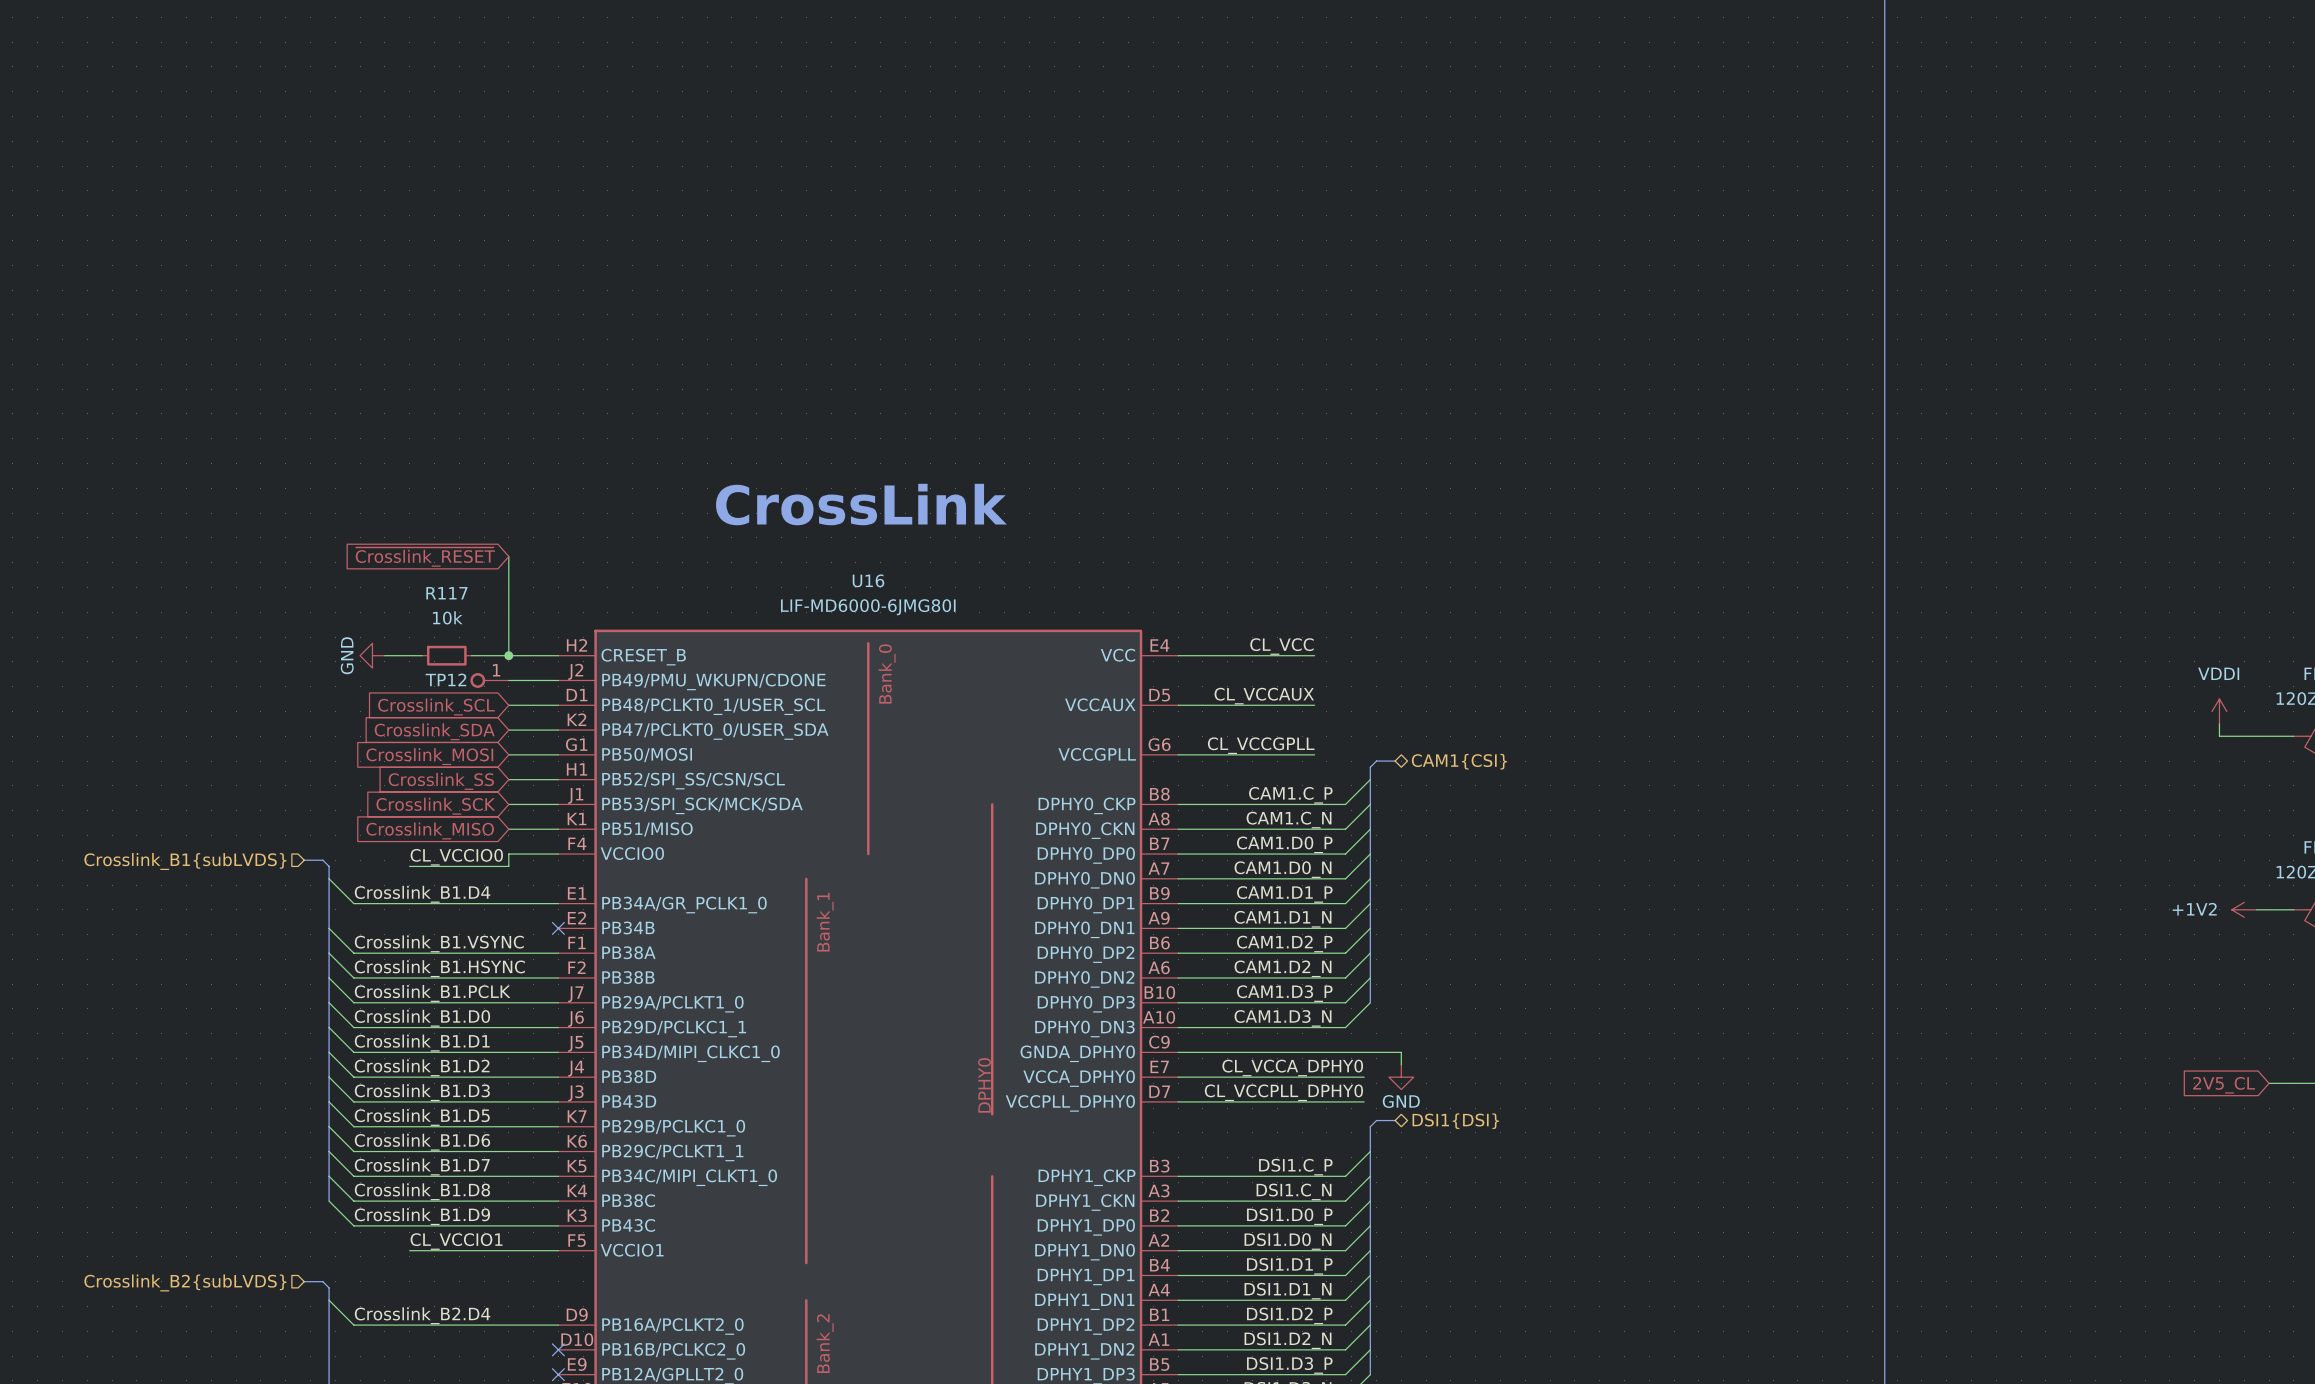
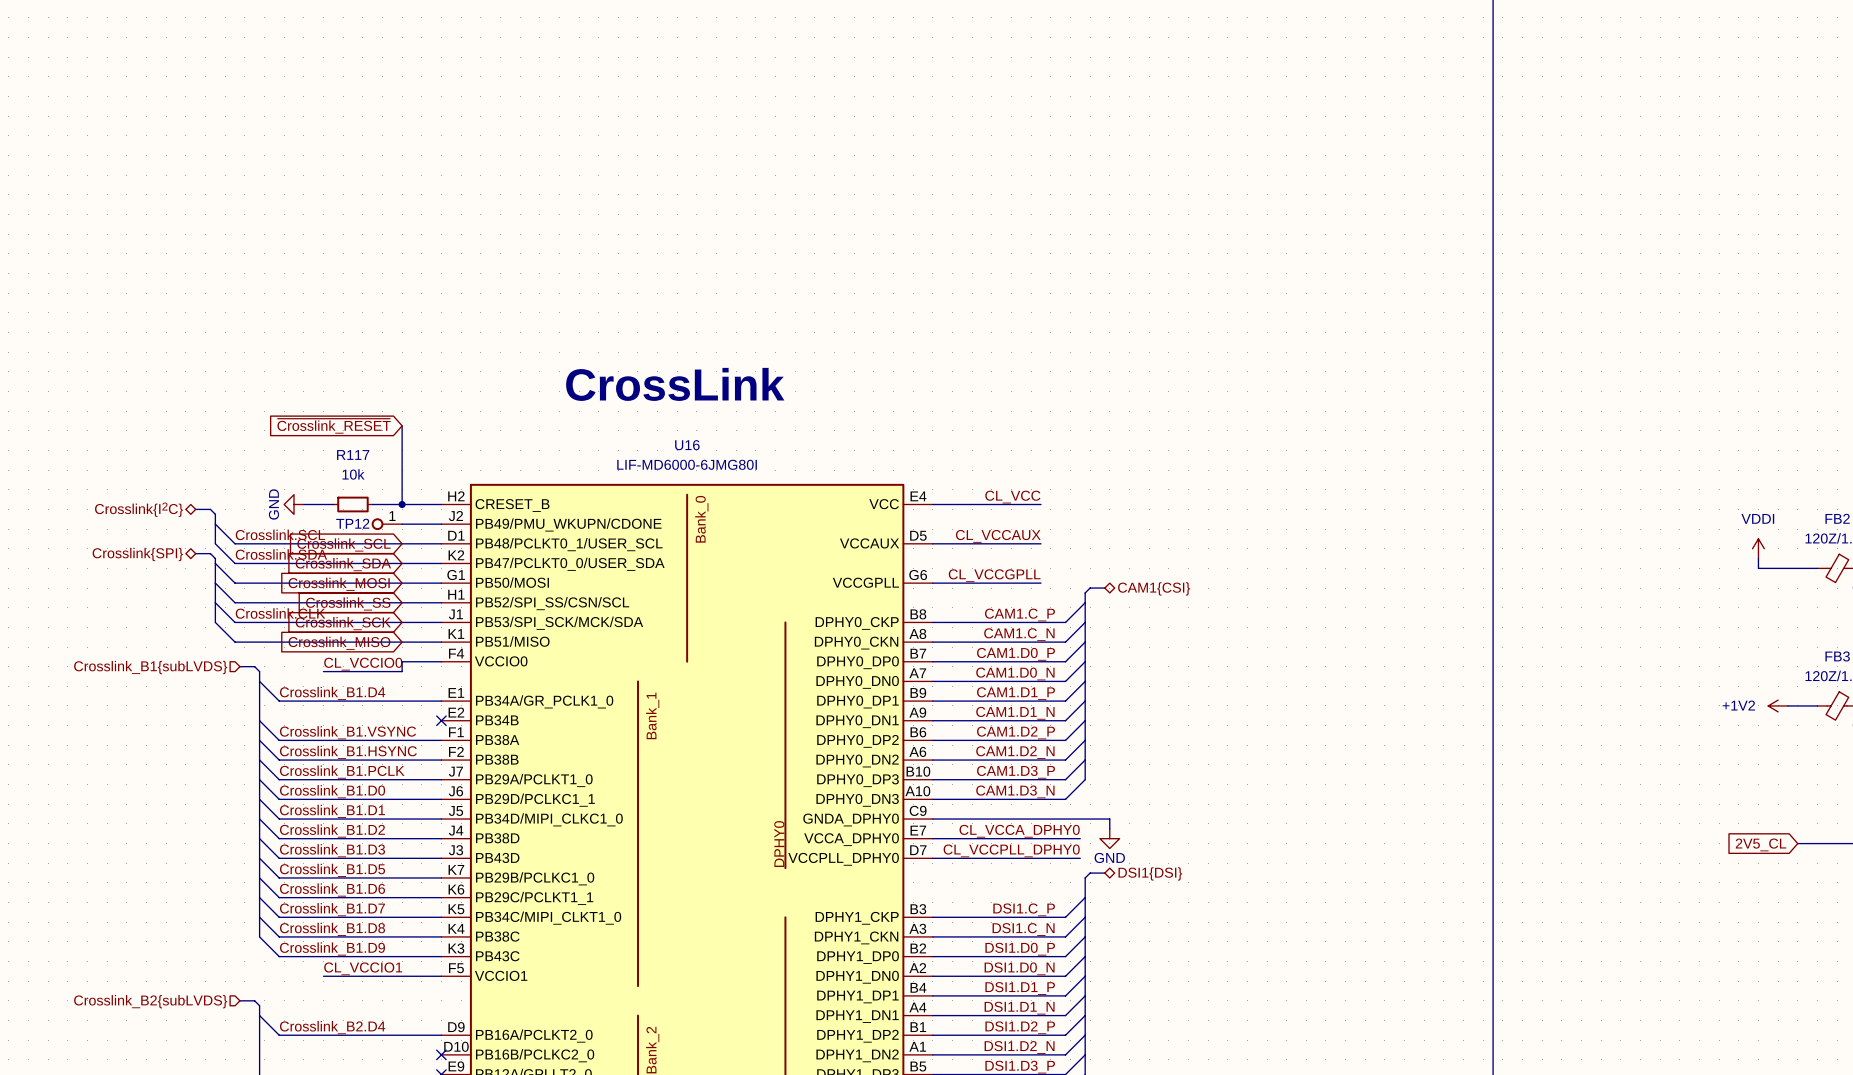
hierarchical label: none -> Crosslink{I2C} (139, 509)
bus: none -> (195, 509) (210, 509) (215, 514) (215, 543)
wire: none -> (215, 524) (235, 543) (402, 543)
label: none -> Crosslink.SCL (280, 534)
wire: none -> (215, 543) (235, 563) (402, 563)
bus: none -> (195, 553) (210, 553) (215, 558) (215, 622)
hierarchical label: none -> Crosslink{SPI} (137, 554)
label: none -> Crosslink.SDA (281, 554)
wire: none -> (215, 563) (235, 583) (402, 583)
wire: none -> (215, 583) (235, 602) (402, 602)
wire: none -> (215, 602) (235, 622) (402, 622)
label: none -> Crosslink.CLK (280, 613)
wire: none -> (215, 622) (235, 642) (402, 642)

